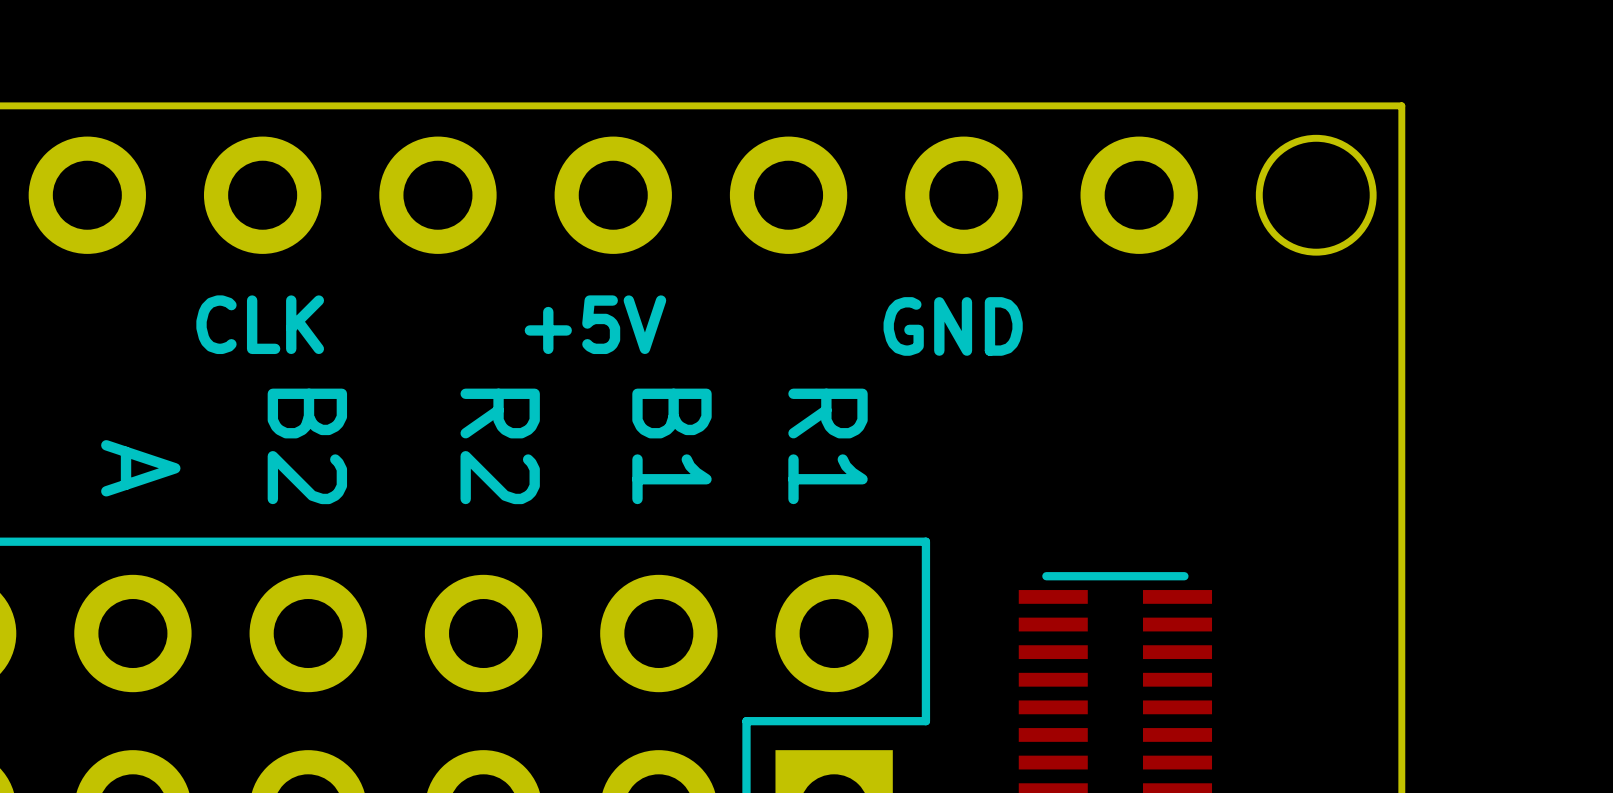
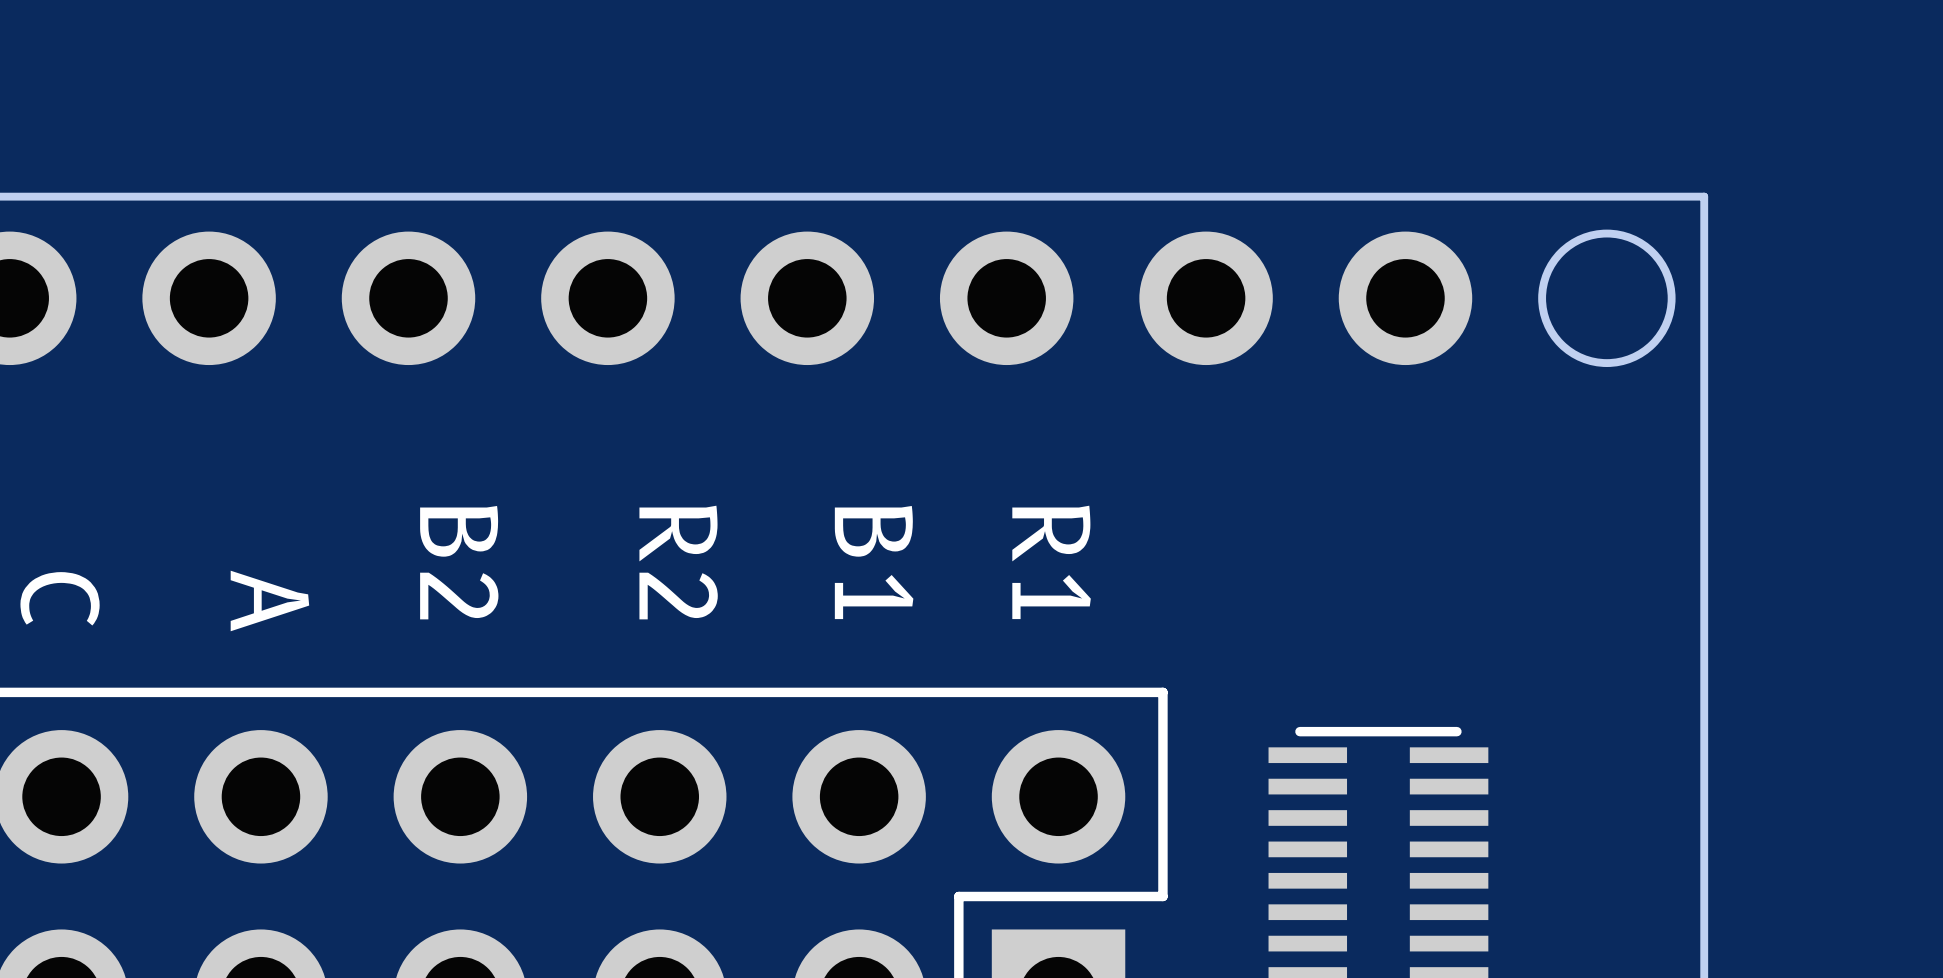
text: CLK (260, 324) -> none
text: +5V (595, 324) -> none
text: GND (953, 326) -> none

